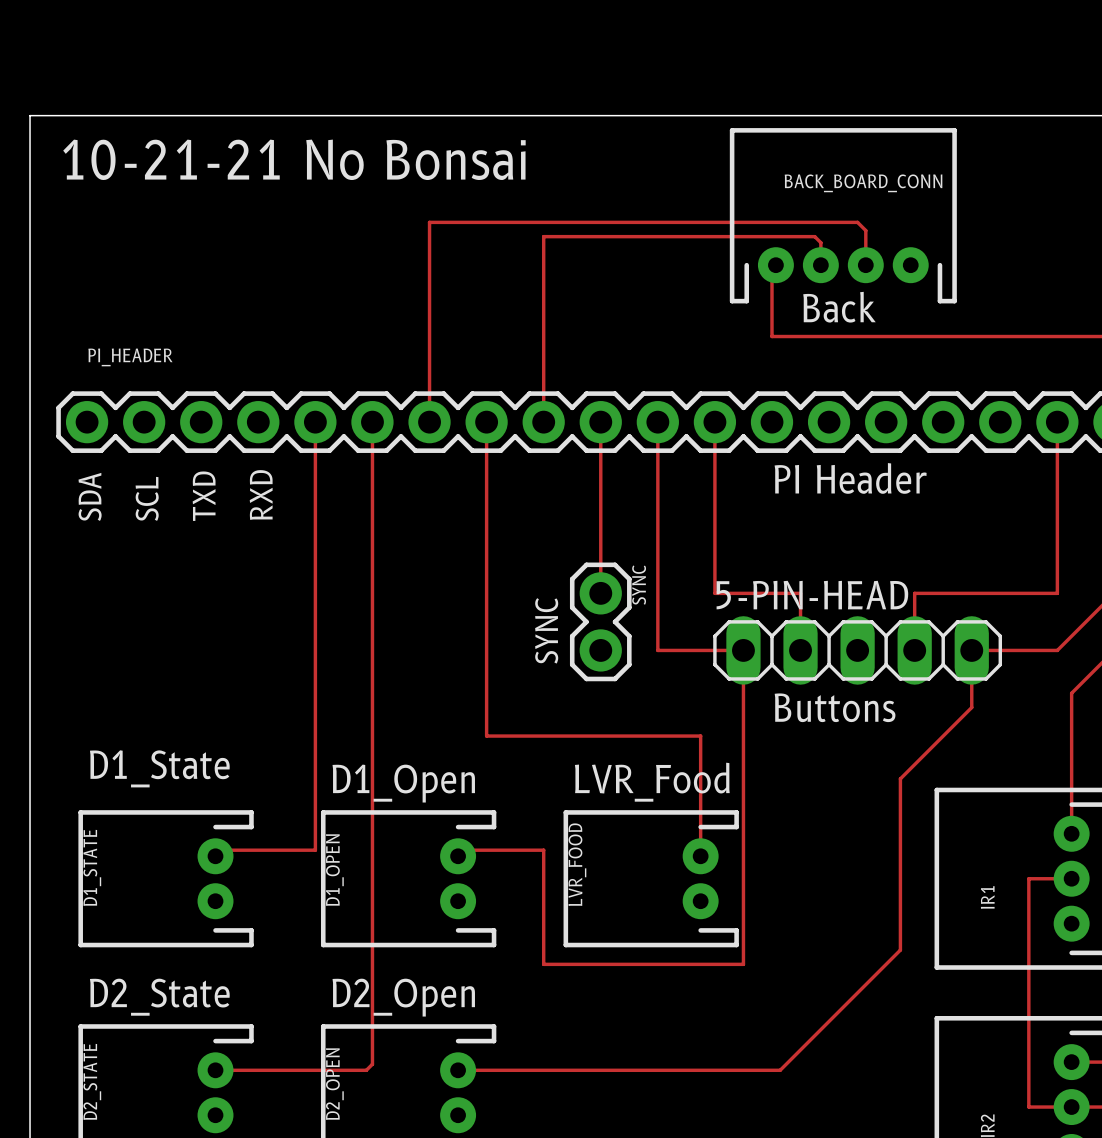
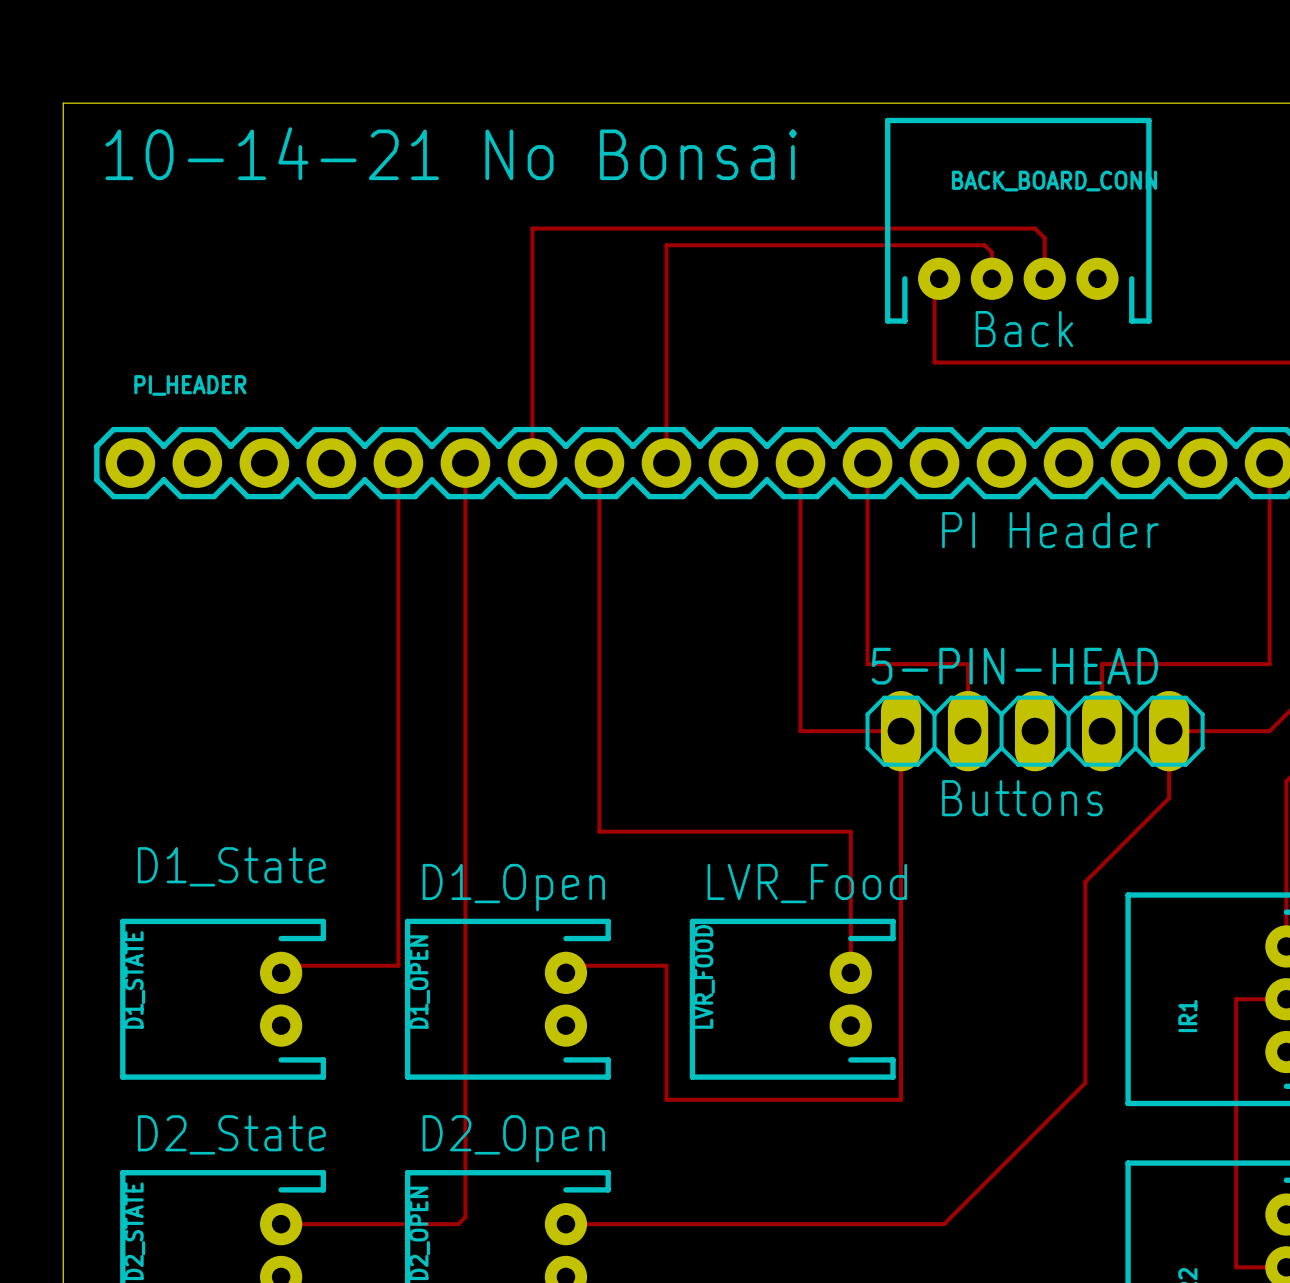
text: 10-21-21 No Bonsai (294, 159) -> 10-14-21 No Bonsai (451, 153)
track: (600, 422) (600, 593) -> none
text: RXD (261, 495) -> none
text: SDA (90, 496) -> none
text: TXD (204, 496) -> none
text: SCL (147, 498) -> none
SYNC: (600, 621) -> none
text: SYNC (546, 630) -> none

